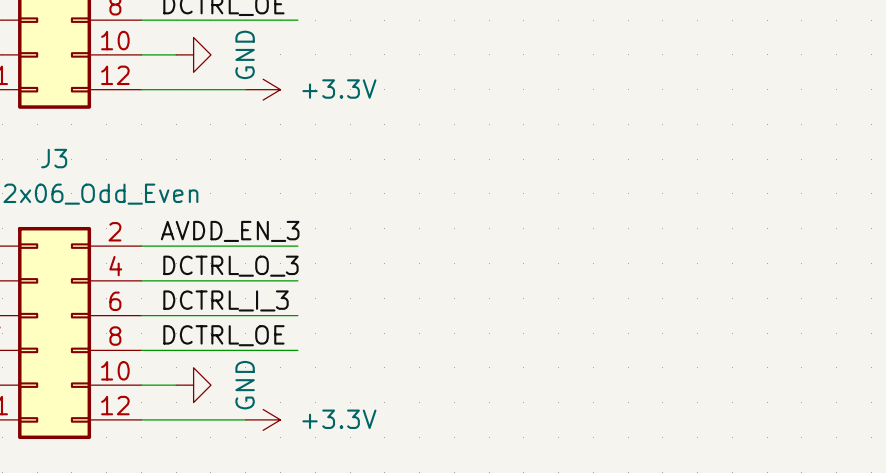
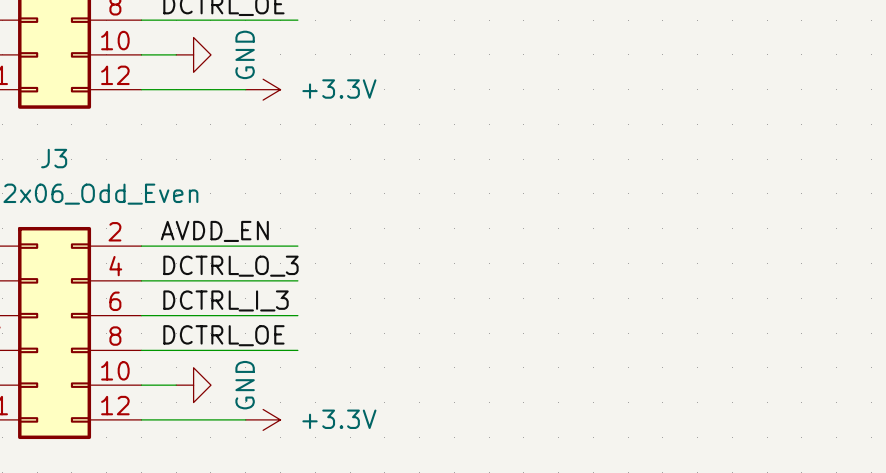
label: AVDD_EN_3 (230, 231) -> AVDD_EN (214, 231)

